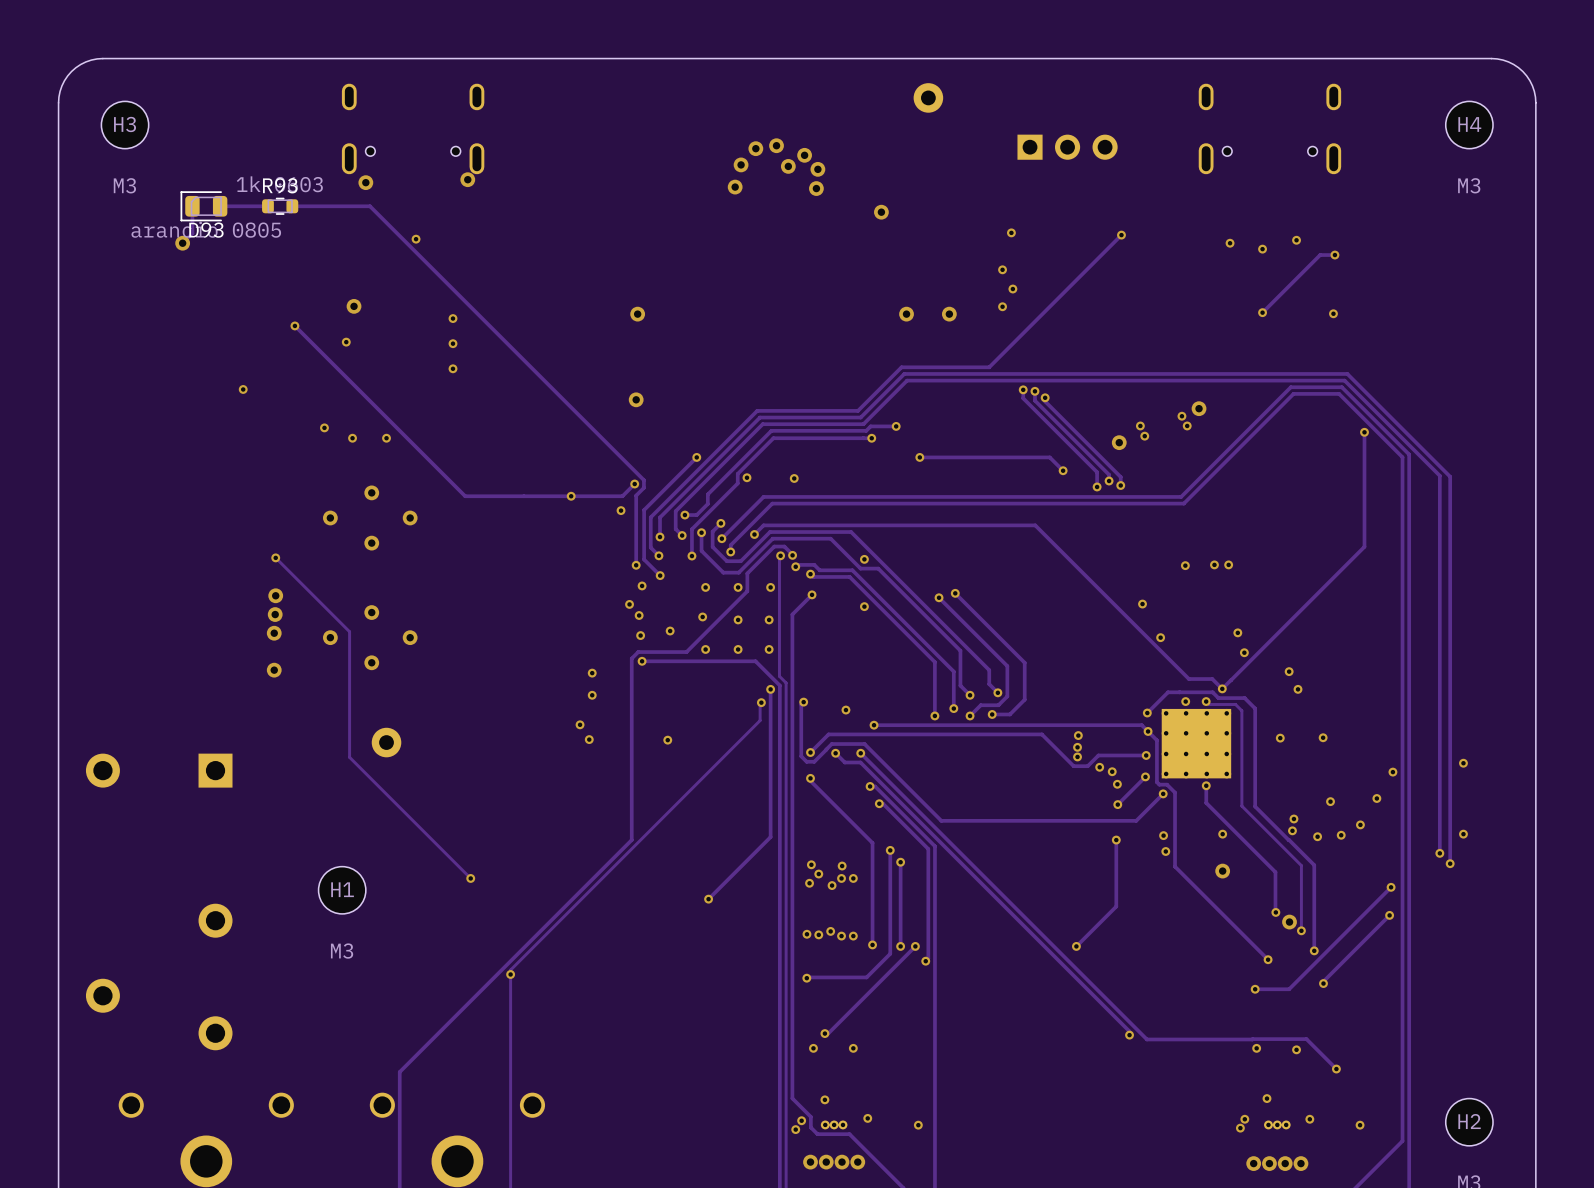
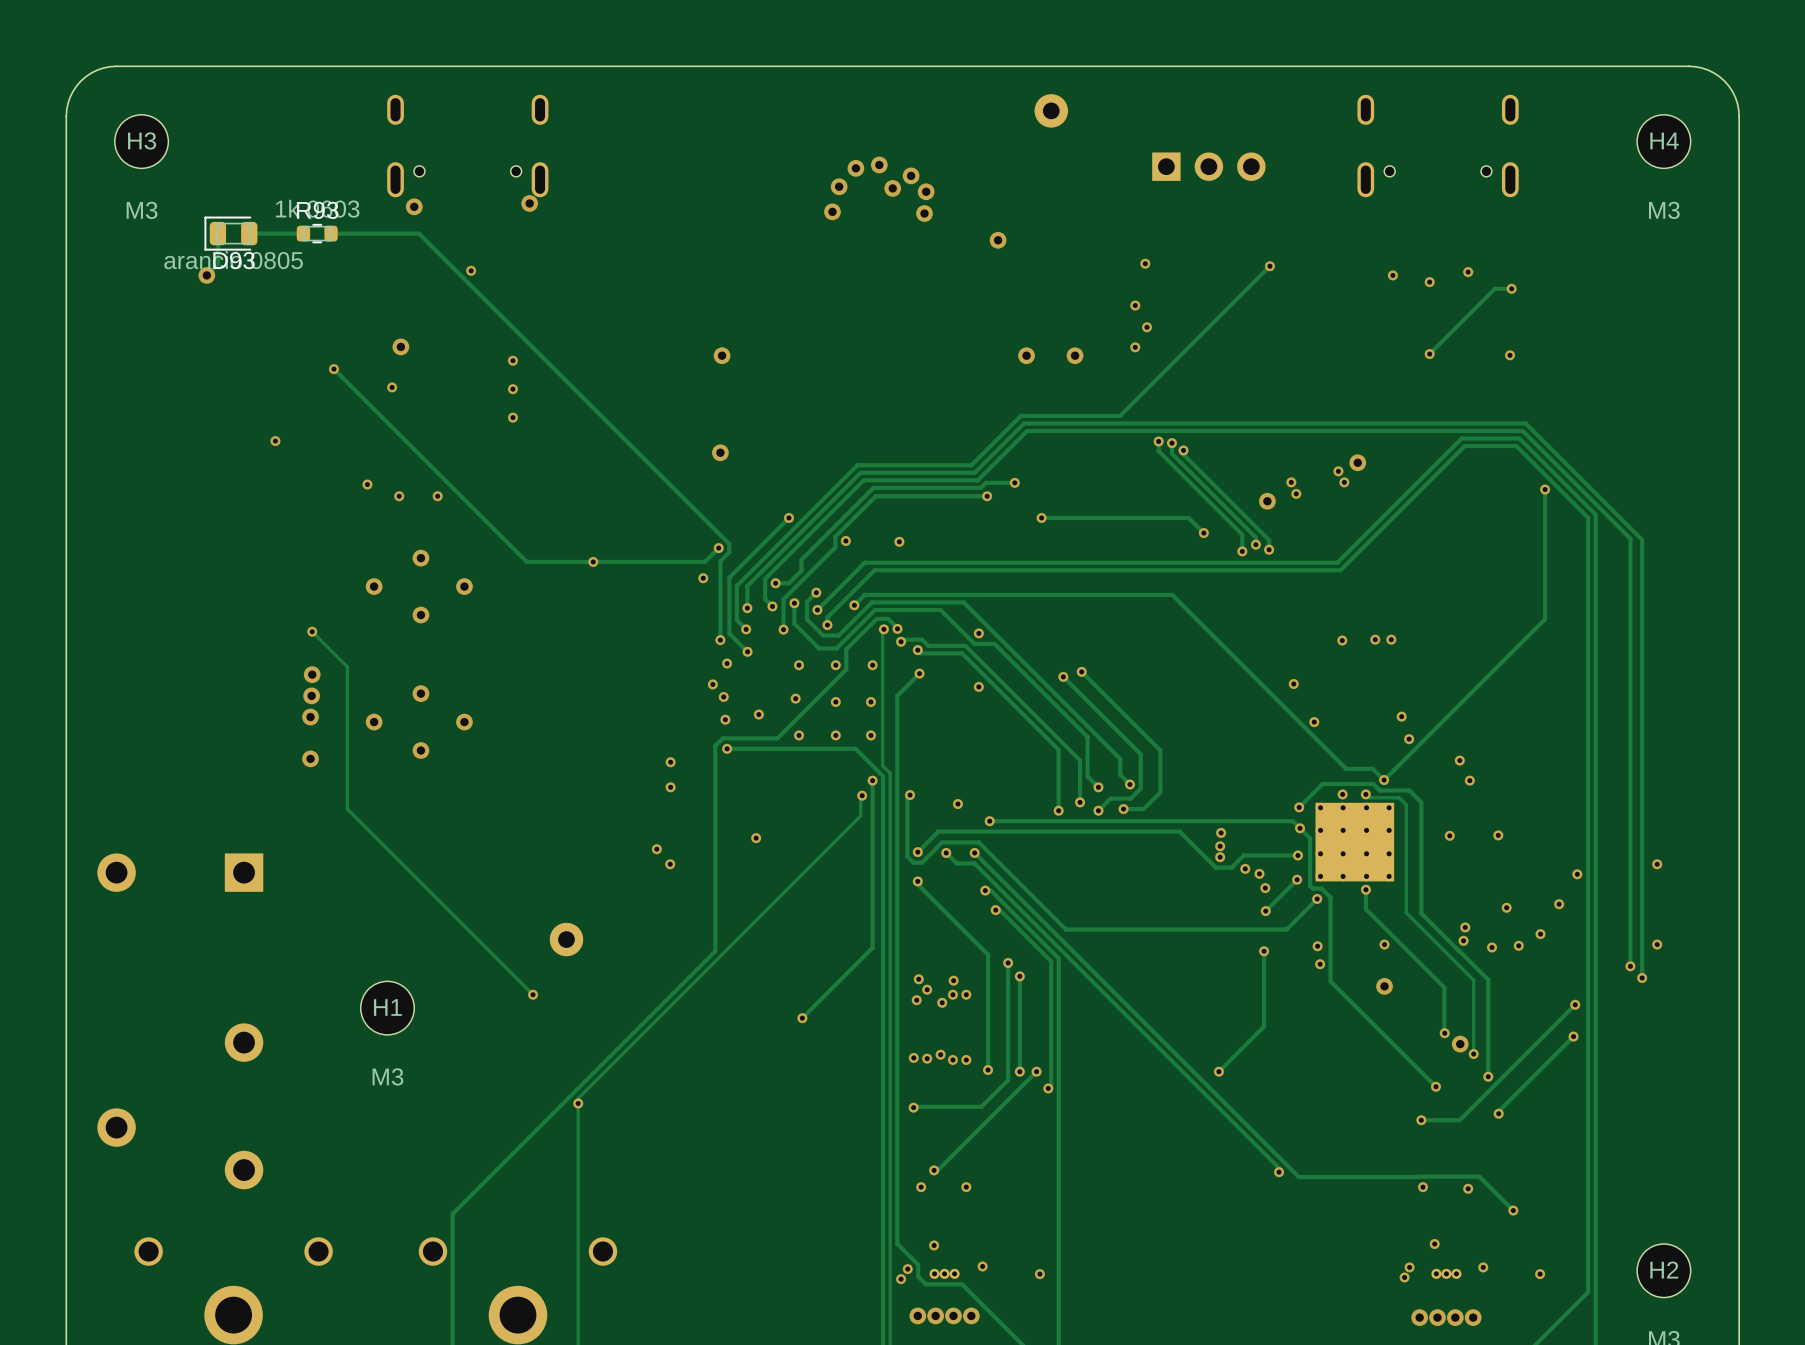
via position: (571, 496) -> (593, 561)
track: (306, 588) (349, 631) (349, 757) -> (347, 666) (347, 809) (395, 857)
via: (580, 724) -> none
via: (589, 739) -> none
part position: (386, 742) -> (566, 939)
via: none -> (656, 849)
via: none -> (670, 864)

